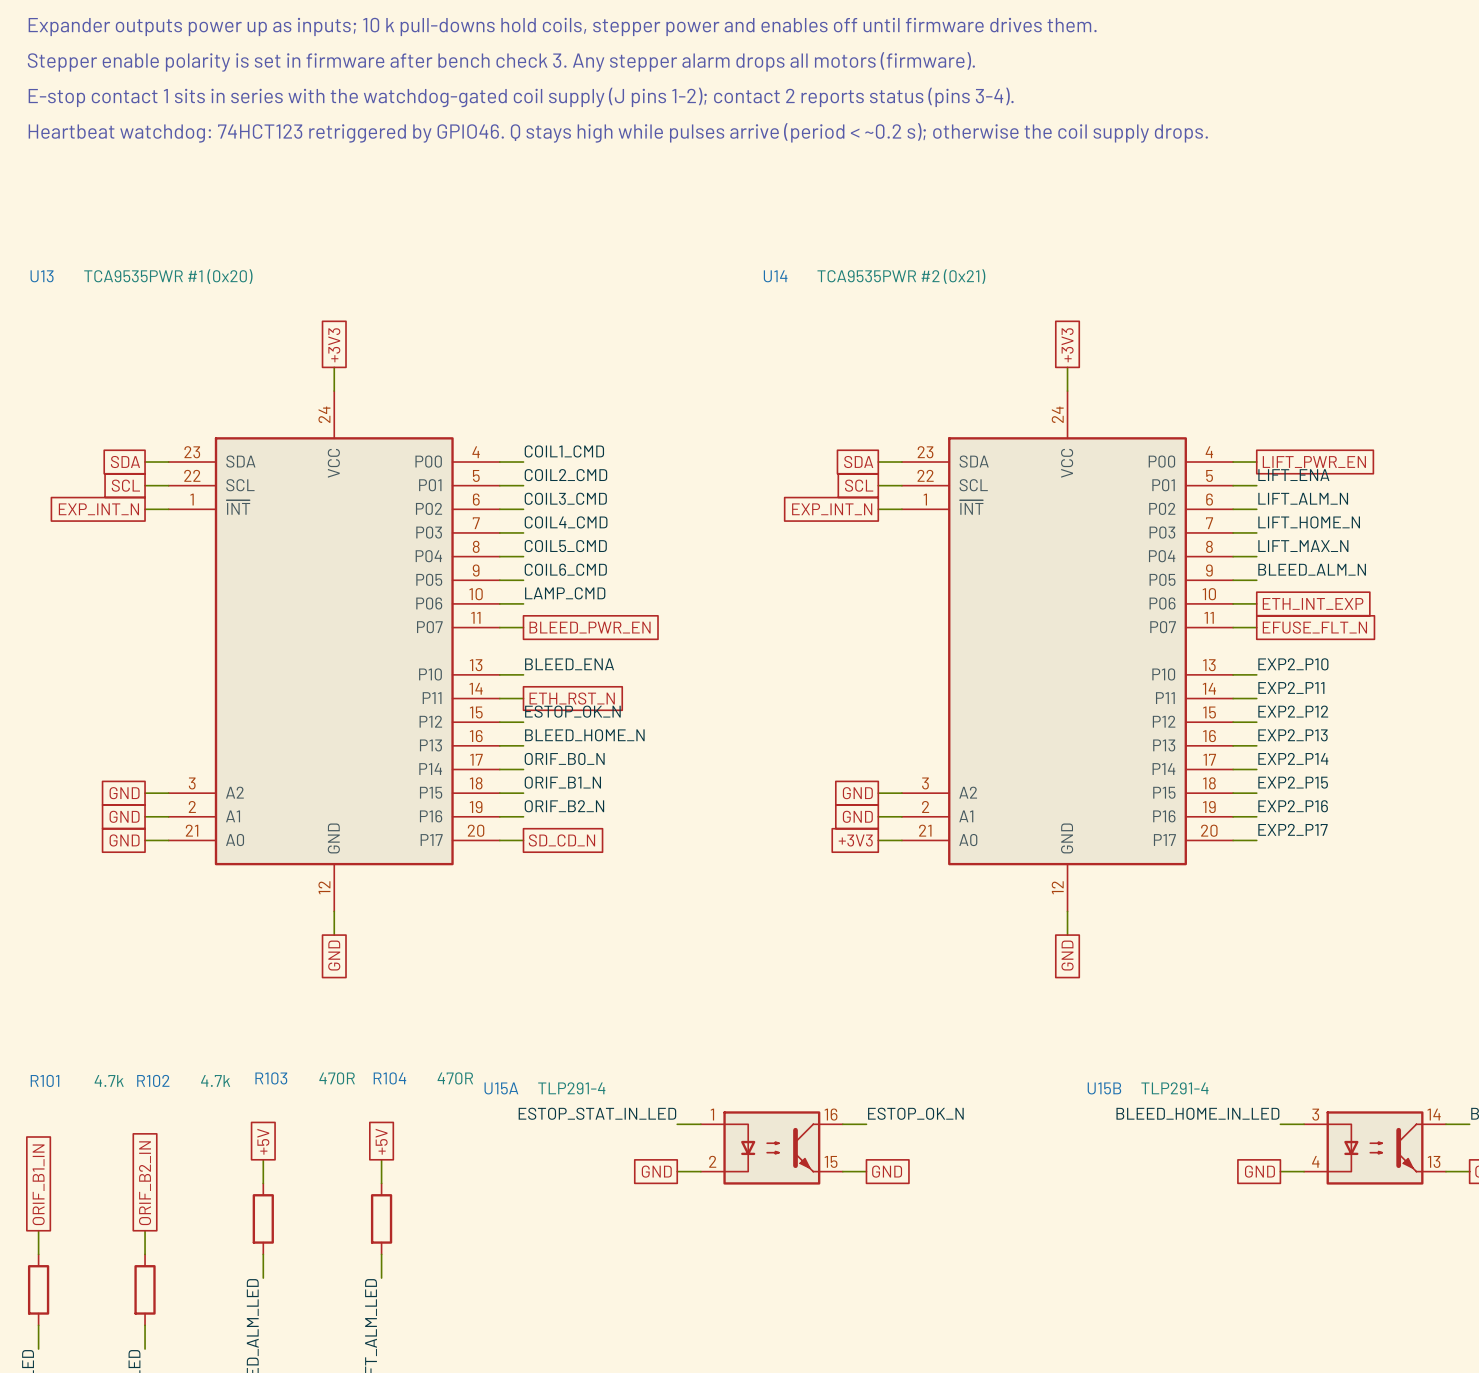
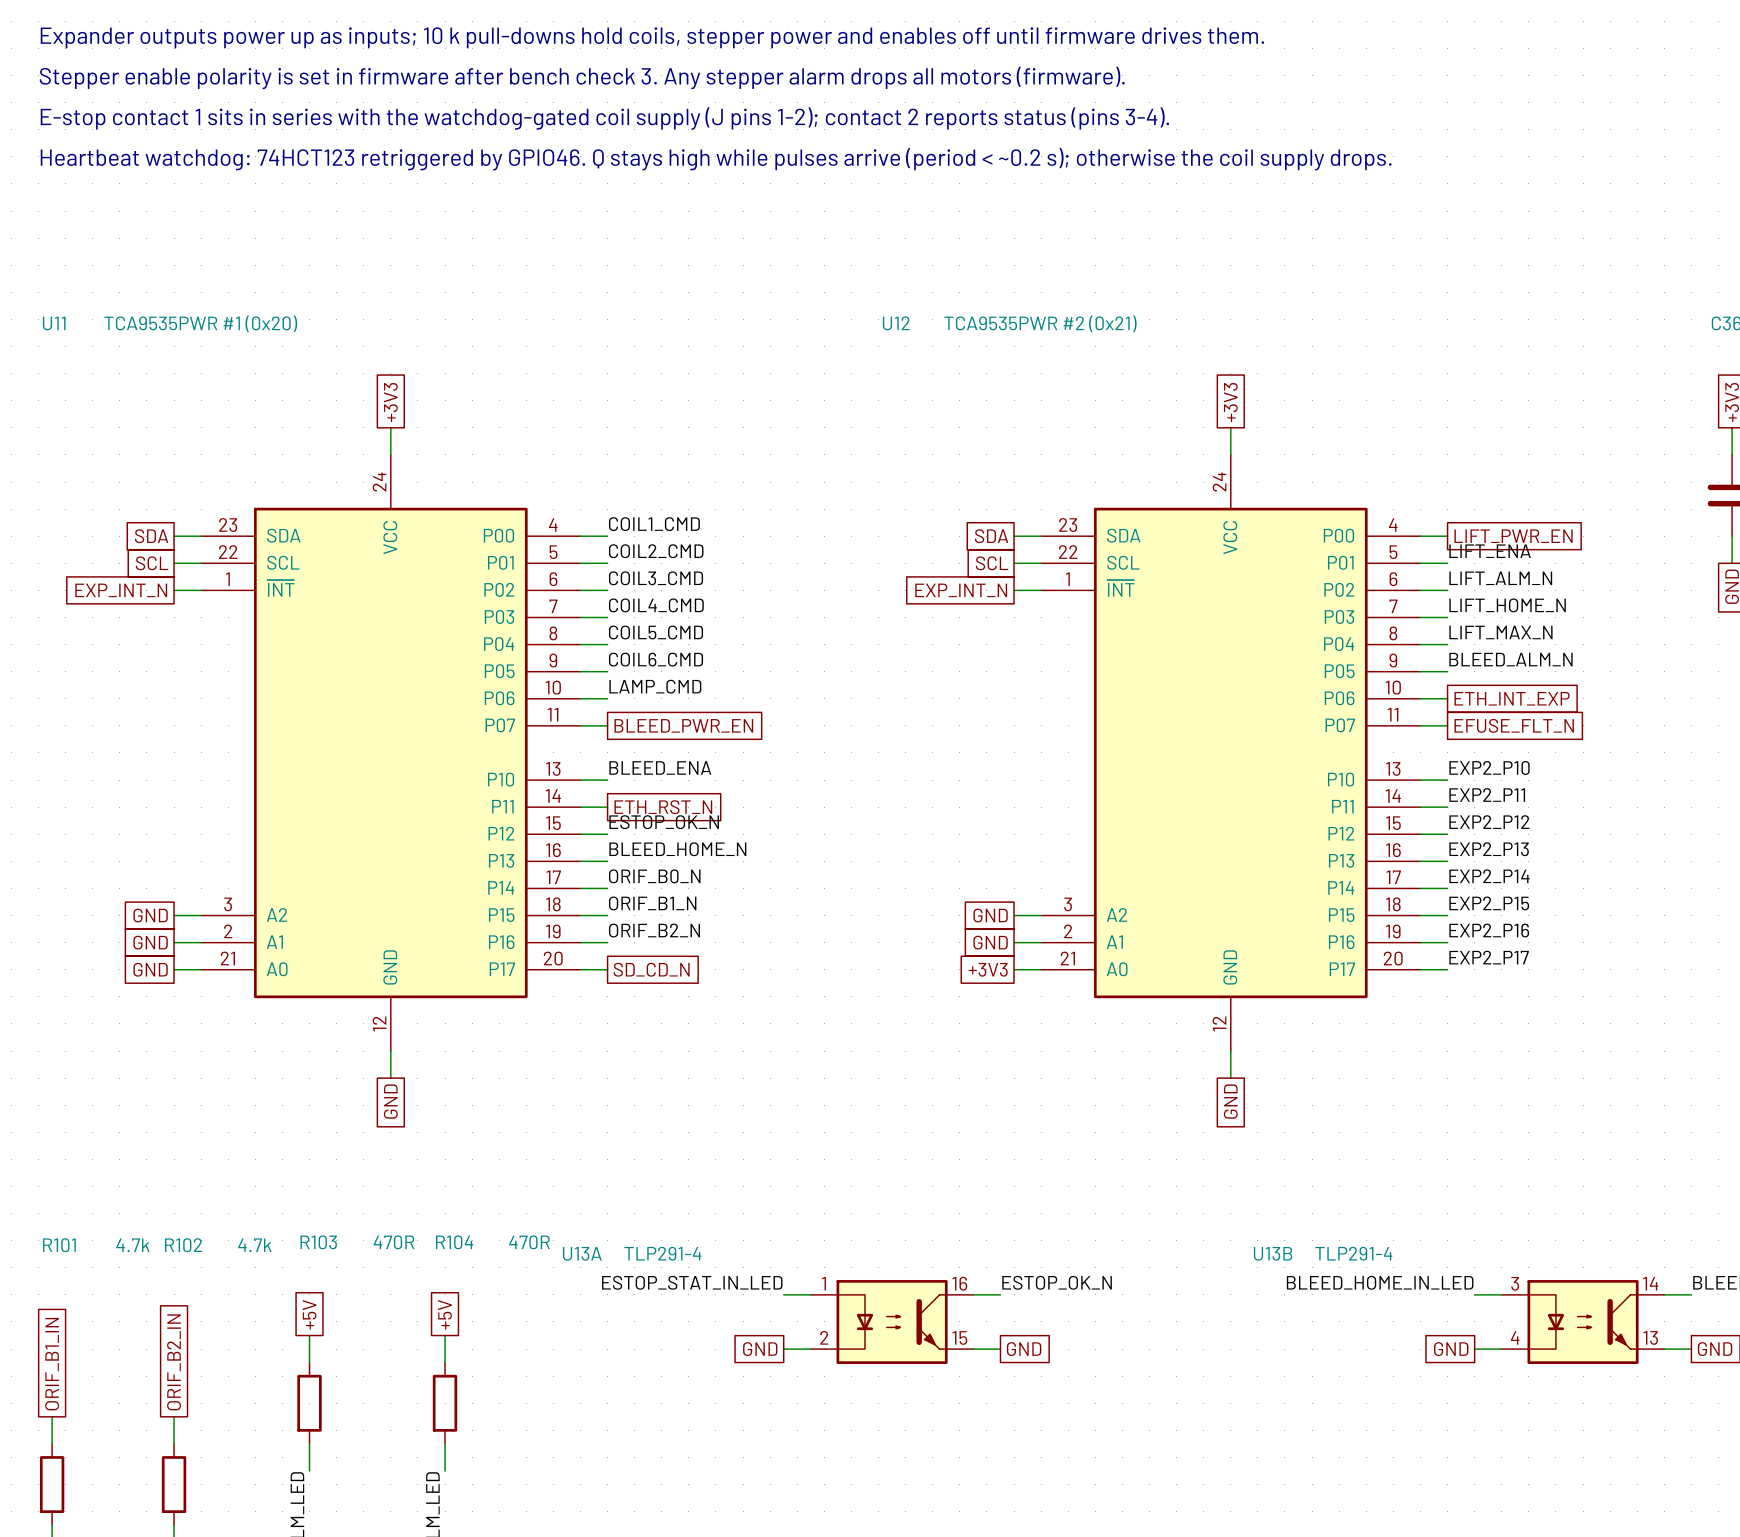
U13 name: U13 (42, 276) -> U11 (54, 323)
U14 name: U14 (775, 276) -> U12 (896, 323)
U15A name: U15A (501, 1088) -> U13A (582, 1253)
U15B name: U15B (1104, 1088) -> U13B (1273, 1253)

